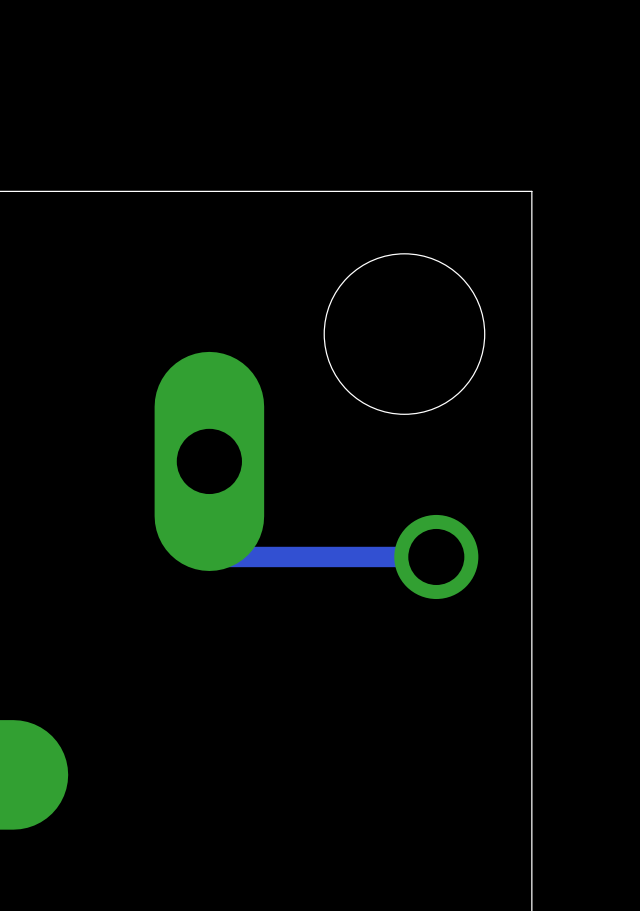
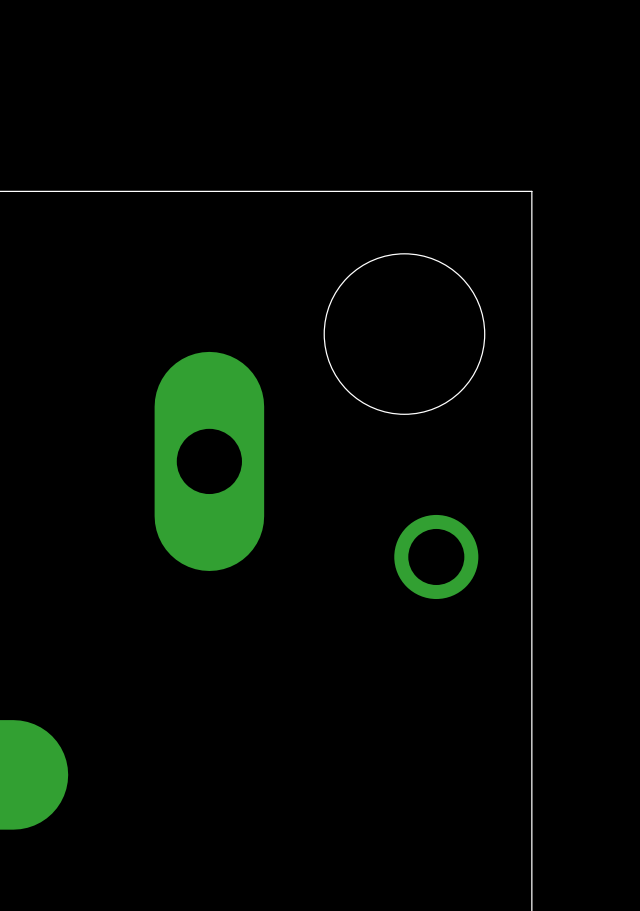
track: (209, 461) (209, 556) (436, 556) -> none

